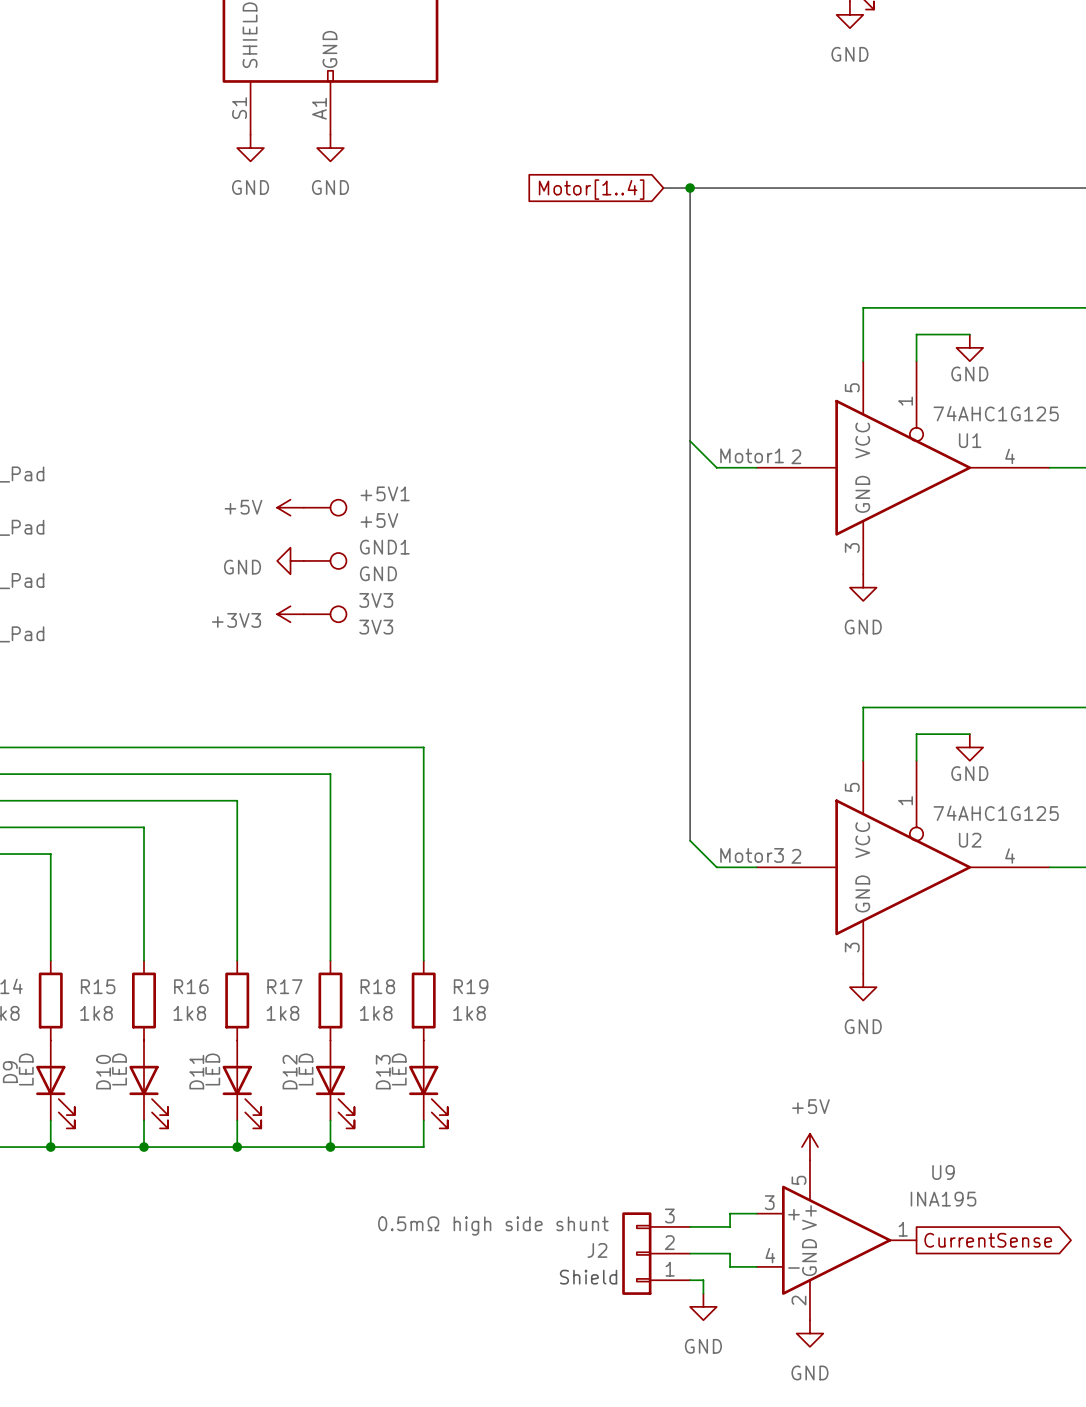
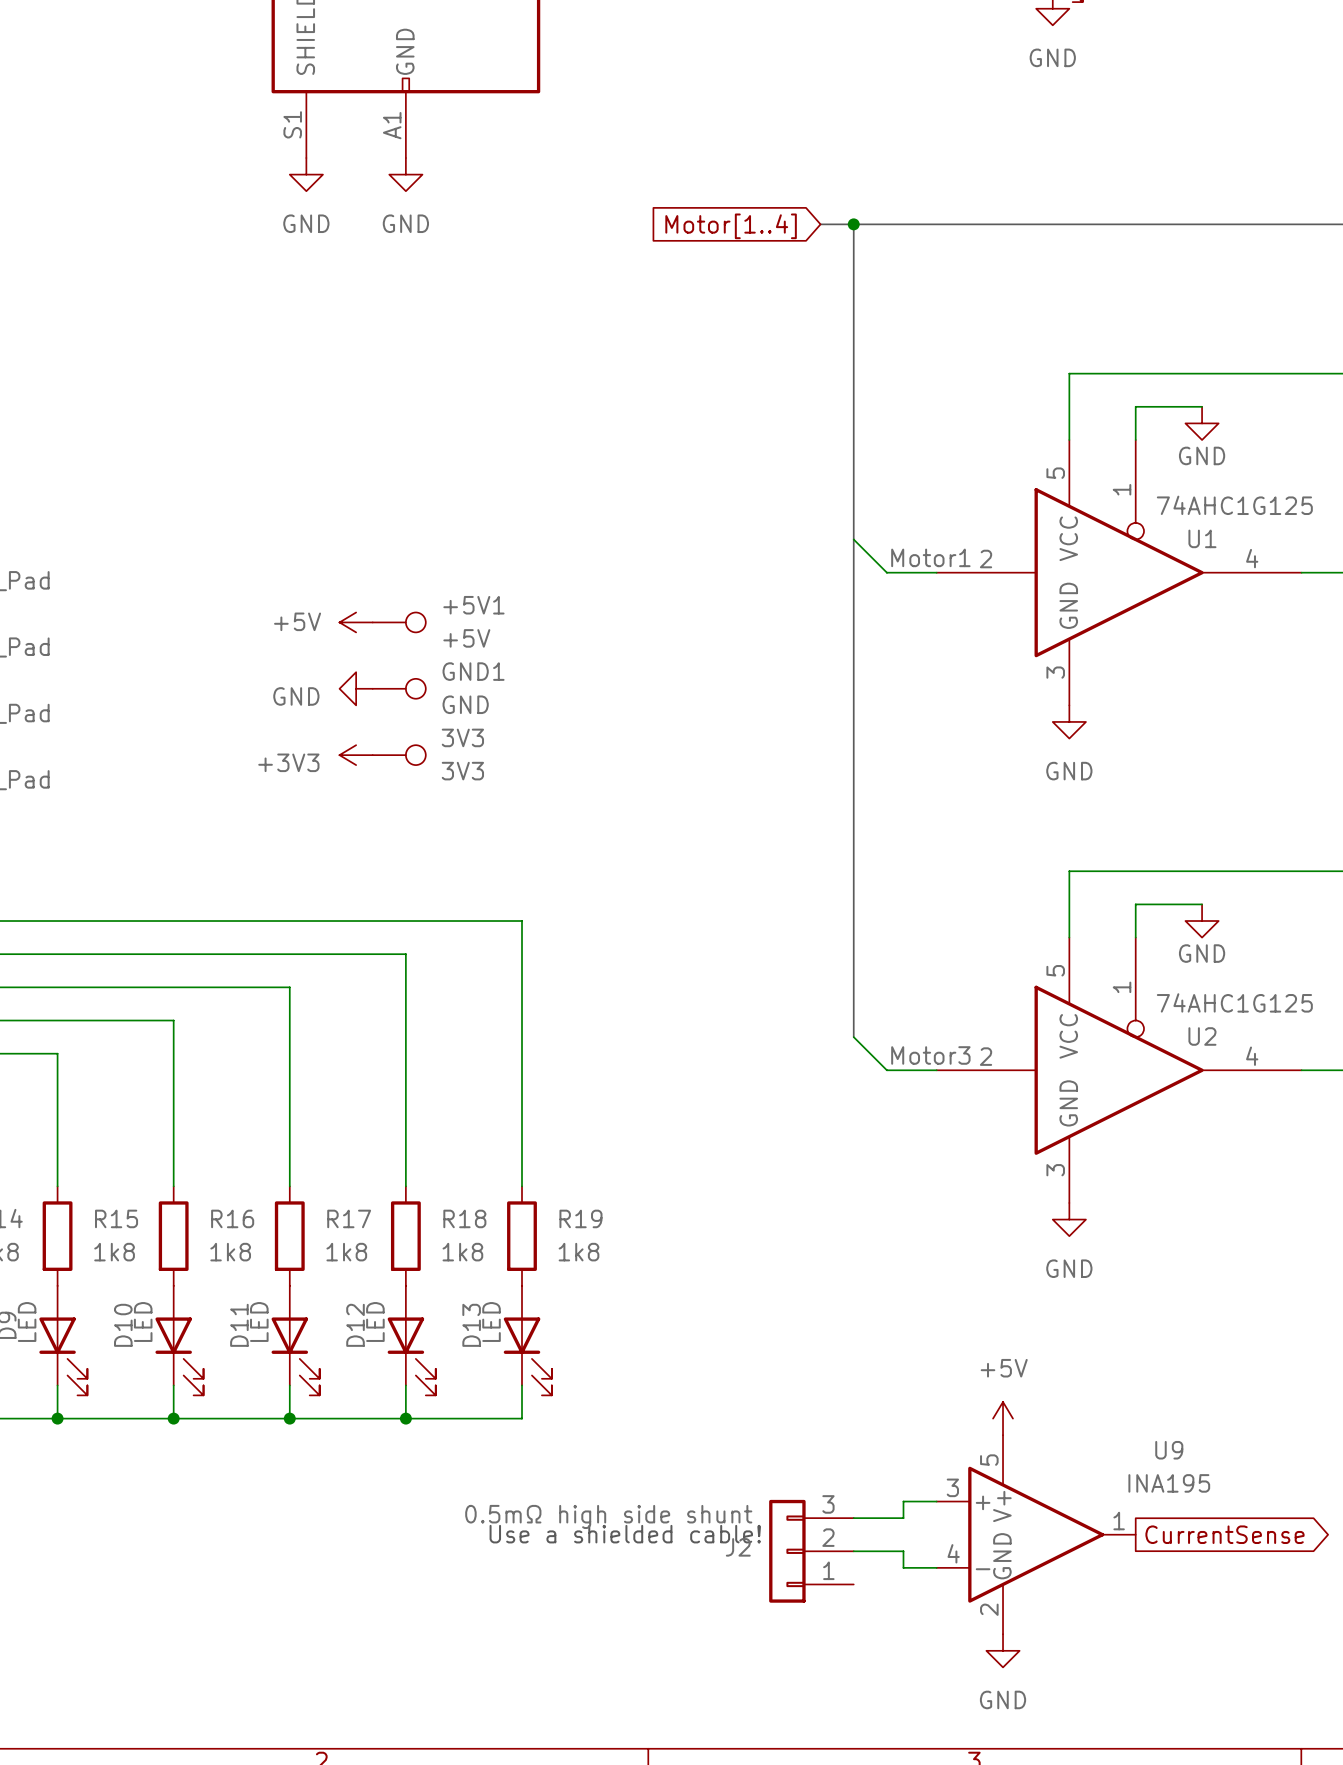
text: none -> Use a shielded cable! (625, 1534)
text: Shield (588, 1277) -> none
wire: (690, 1280) (703, 1280) (703, 1293) -> none
power symbol: GND (703, 1306) -> none

